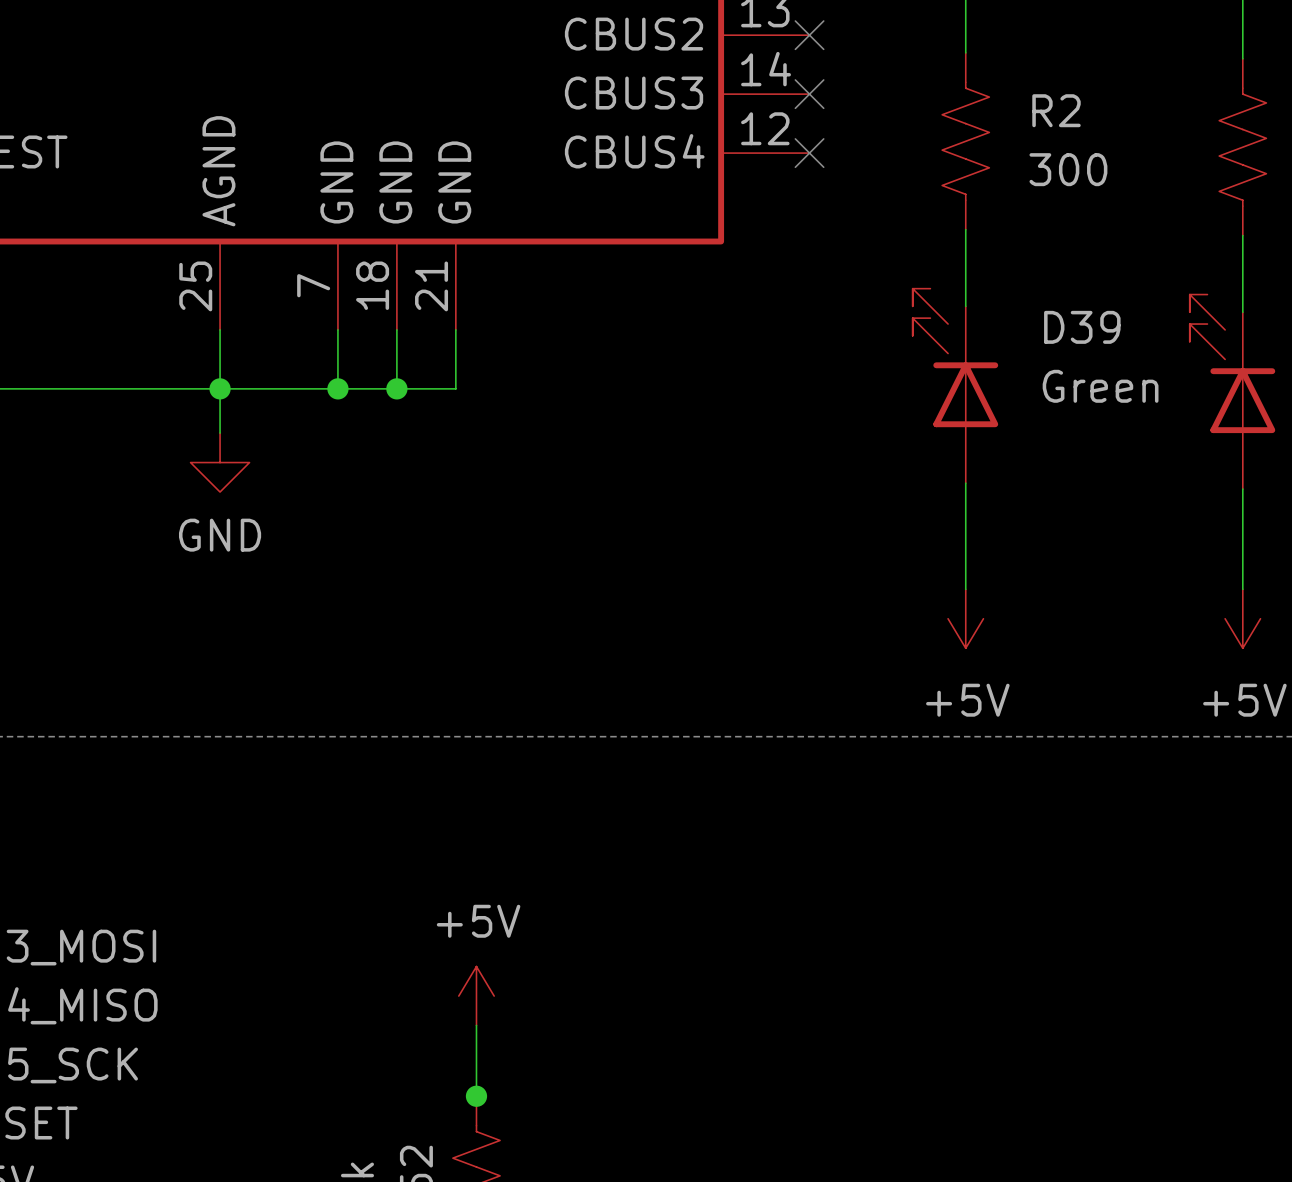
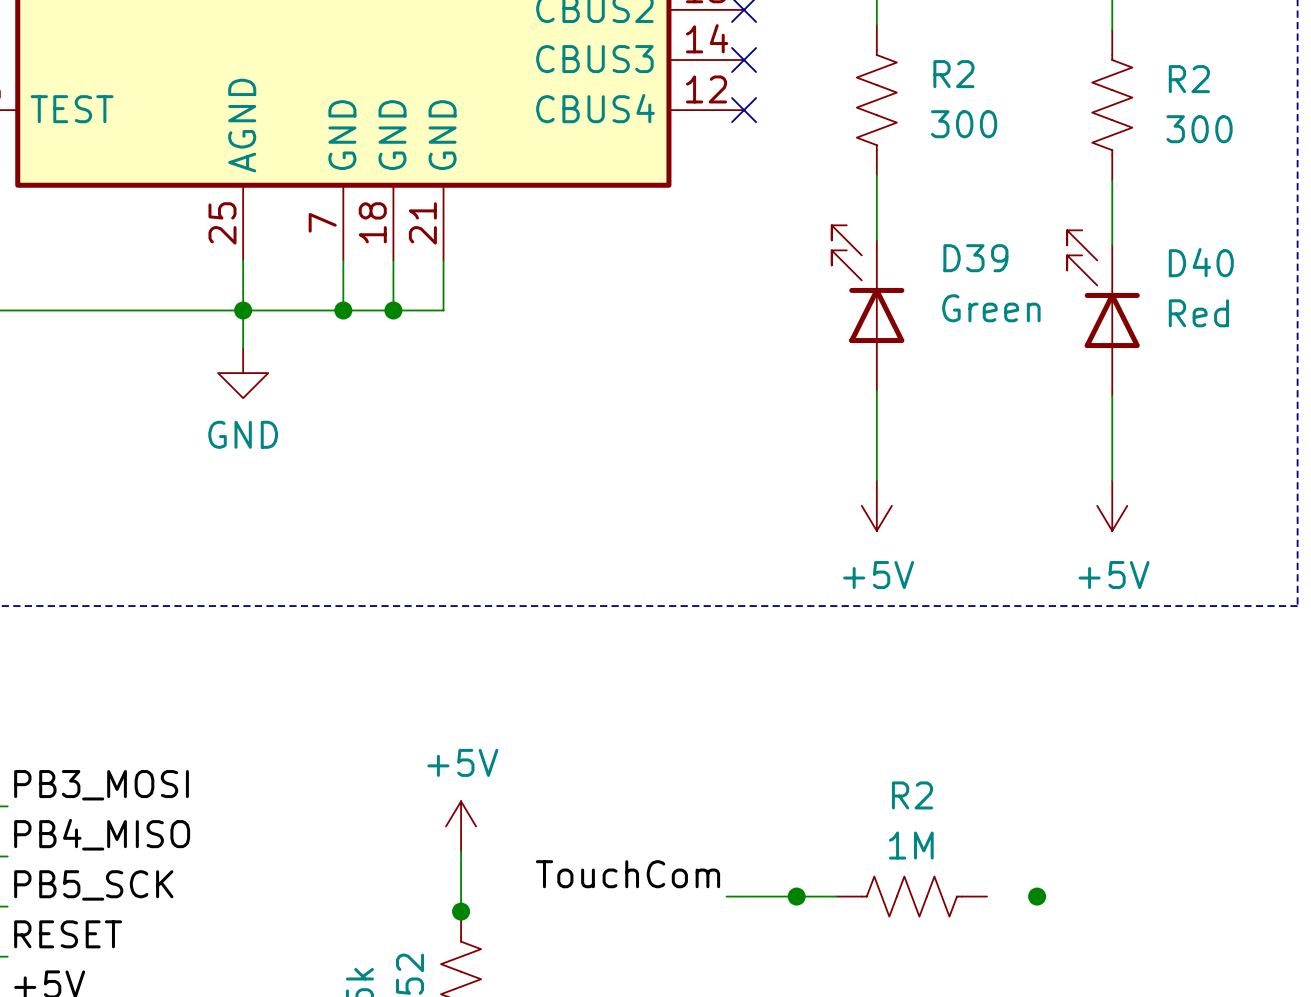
label: none -> TouchCom (627, 874)
wire: none -> (726, 896) (836, 896)
junction: none -> (796, 896)
R2: none -> 1M (911, 896)
junction: none -> (1037, 896)

